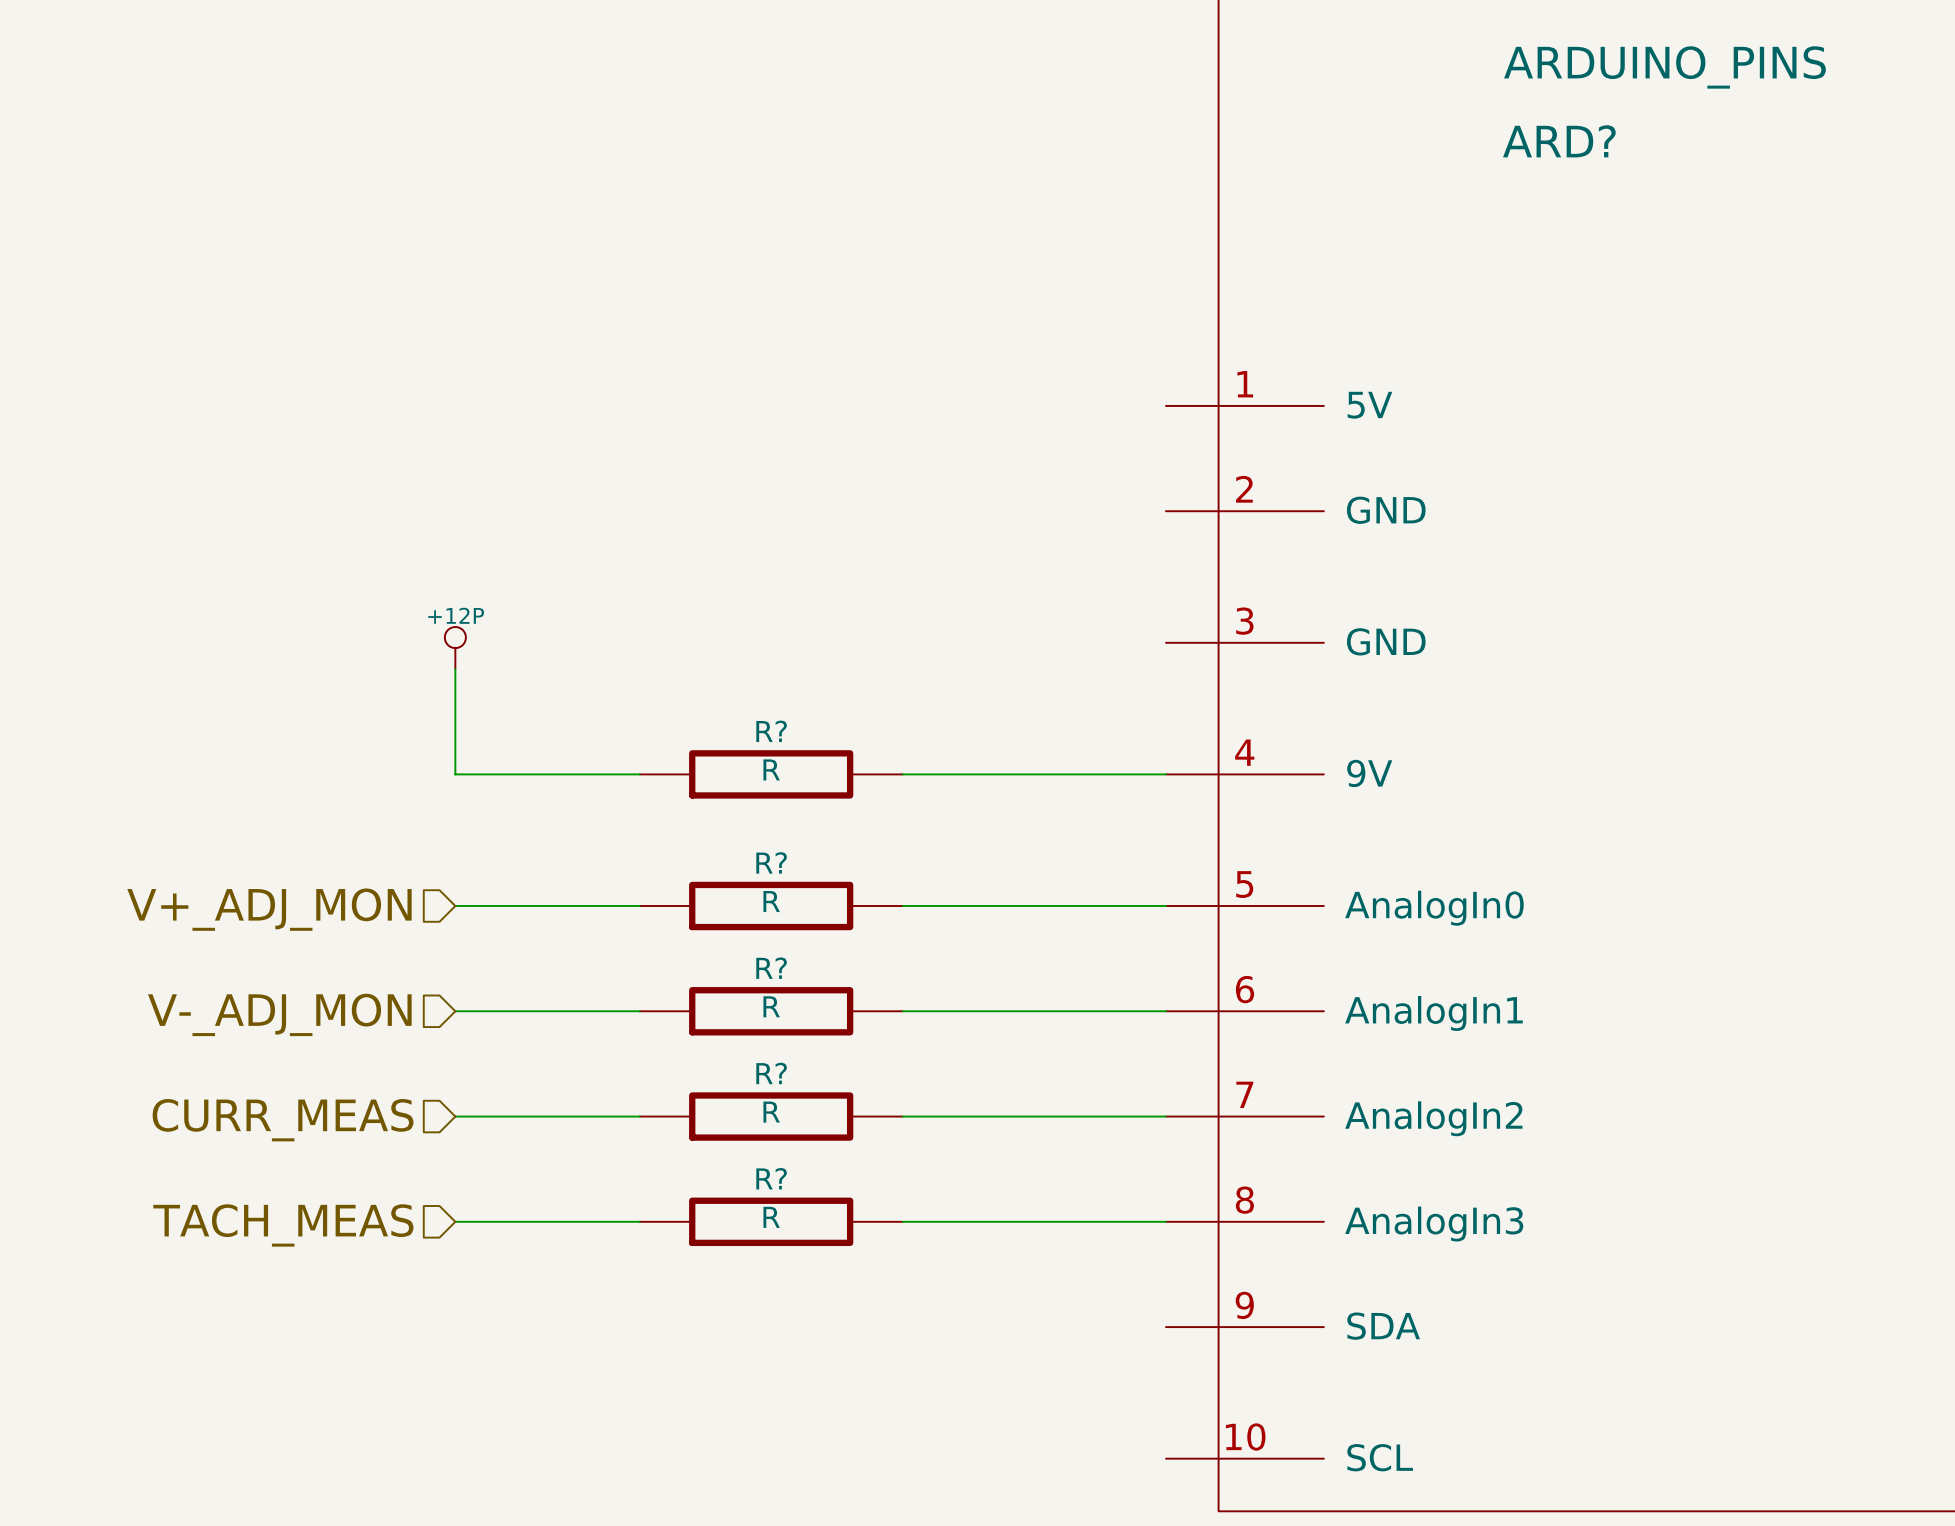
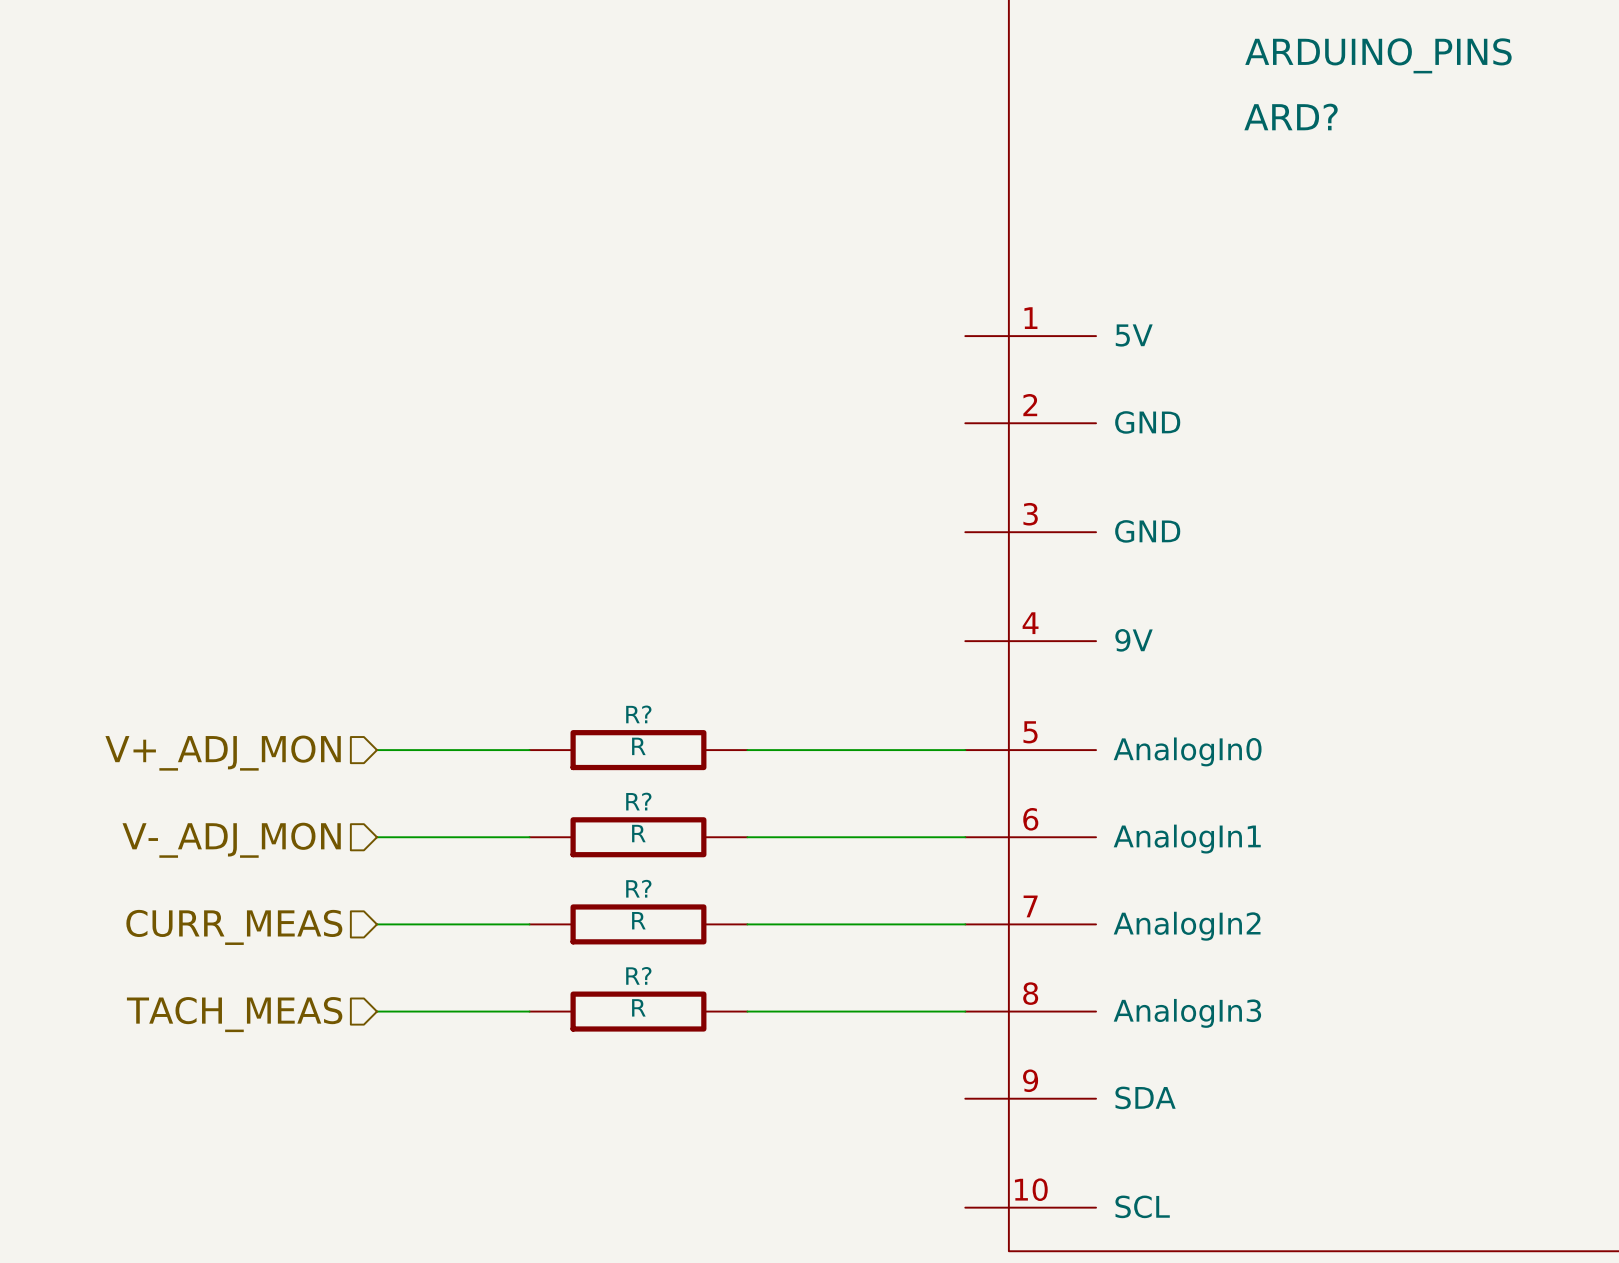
power symbol: +12P (455, 648) -> none
wire: (455, 669) (455, 774) (639, 774) -> none
R?: R (771, 774) -> none
wire: (902, 774) (1165, 774) -> none

